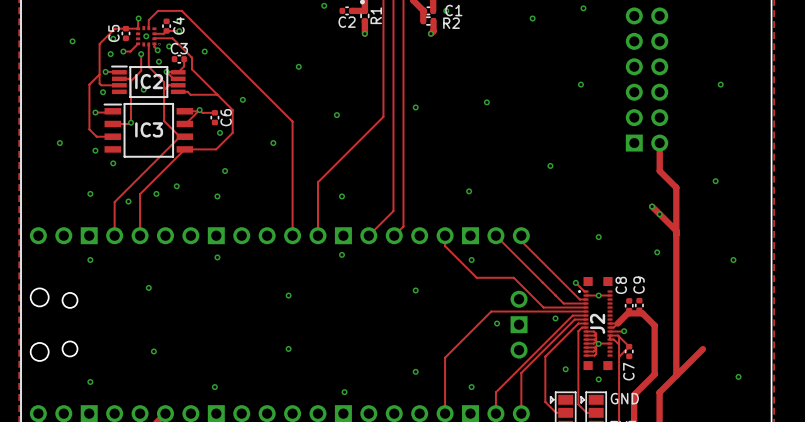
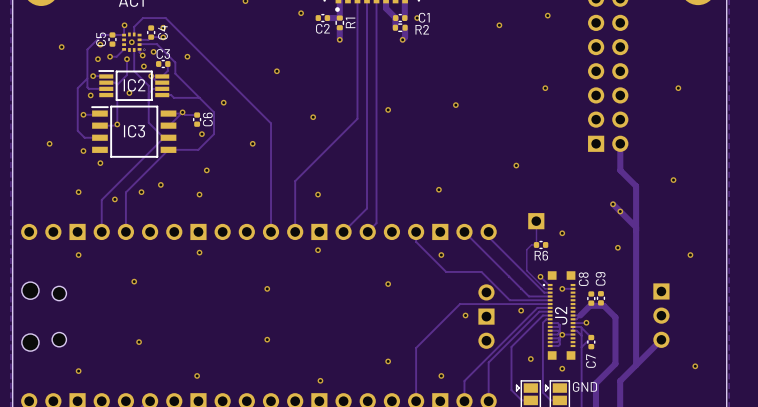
part: none -> (536, 221)
R6: none -> (541, 244)
track: (586, 295) (598, 295) -> (550, 288) (544, 288) (526, 270) (526, 249) (531, 244) (536, 244) (536, 225) (541, 221)
part: none -> (661, 315)

